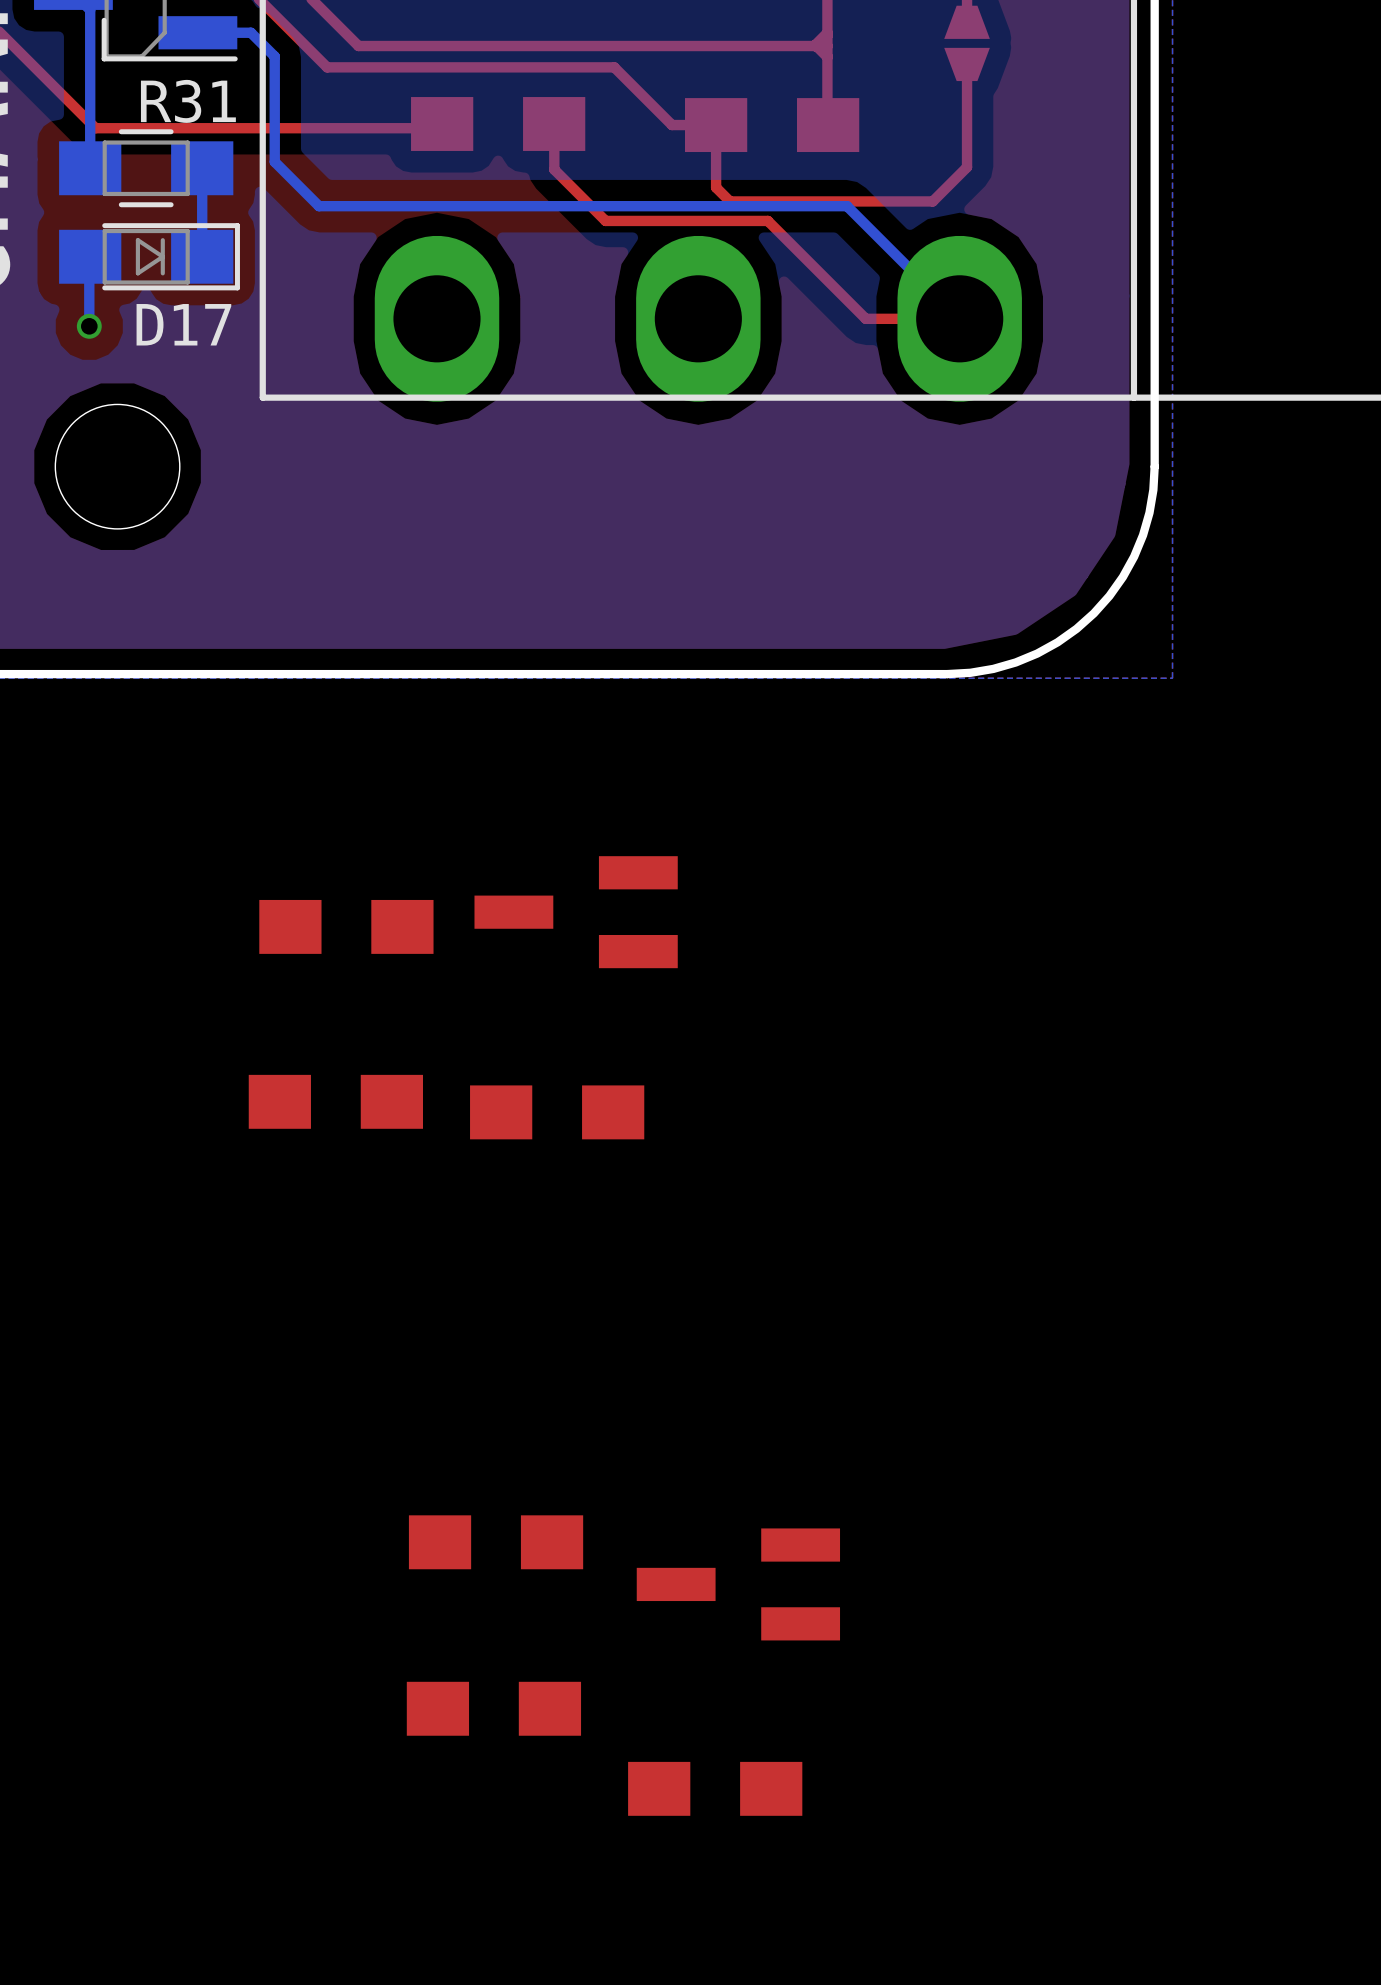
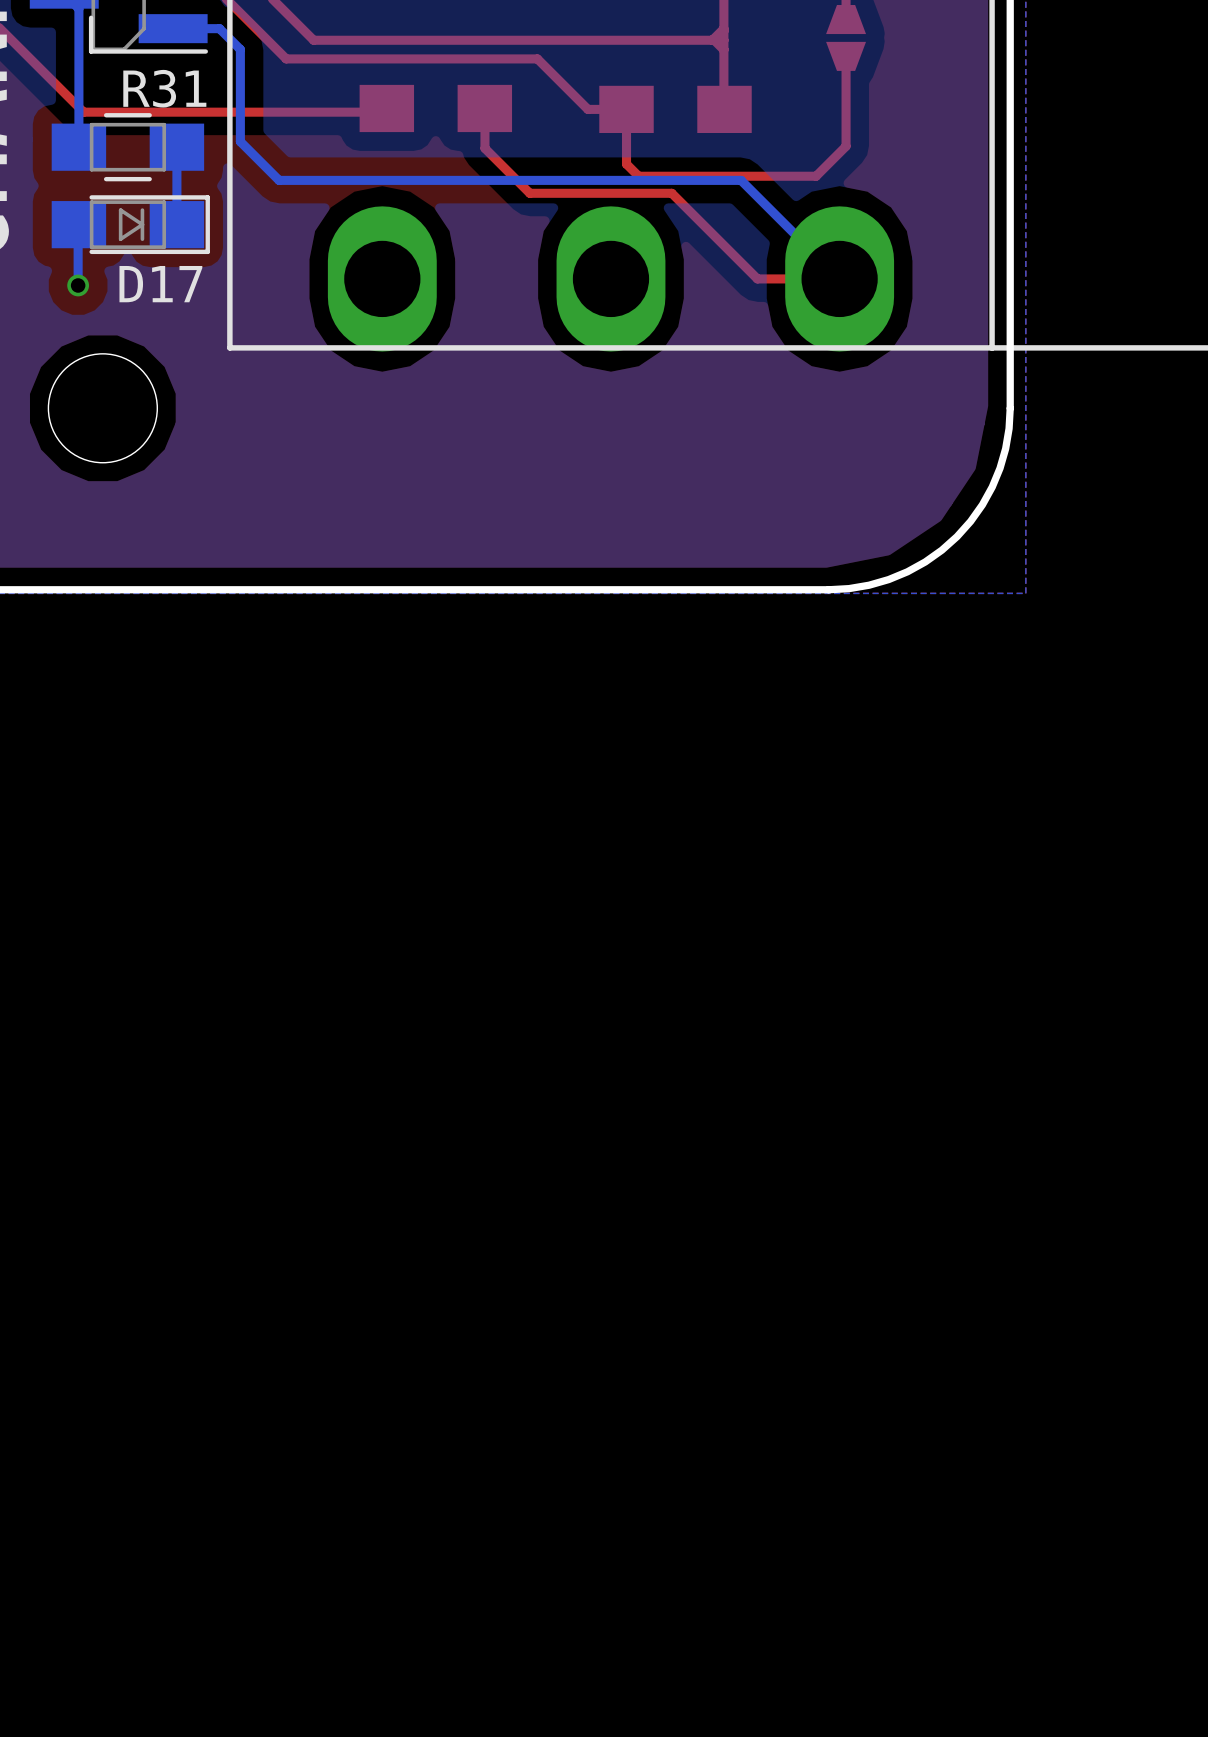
part: (576, 912) -> none
part: (346, 926) -> none
part: (335, 1101) -> none
part: (557, 1112) -> none
part: (496, 1542) -> none
part: (738, 1584) -> none
part: (493, 1708) -> none
part: (715, 1788) -> none

